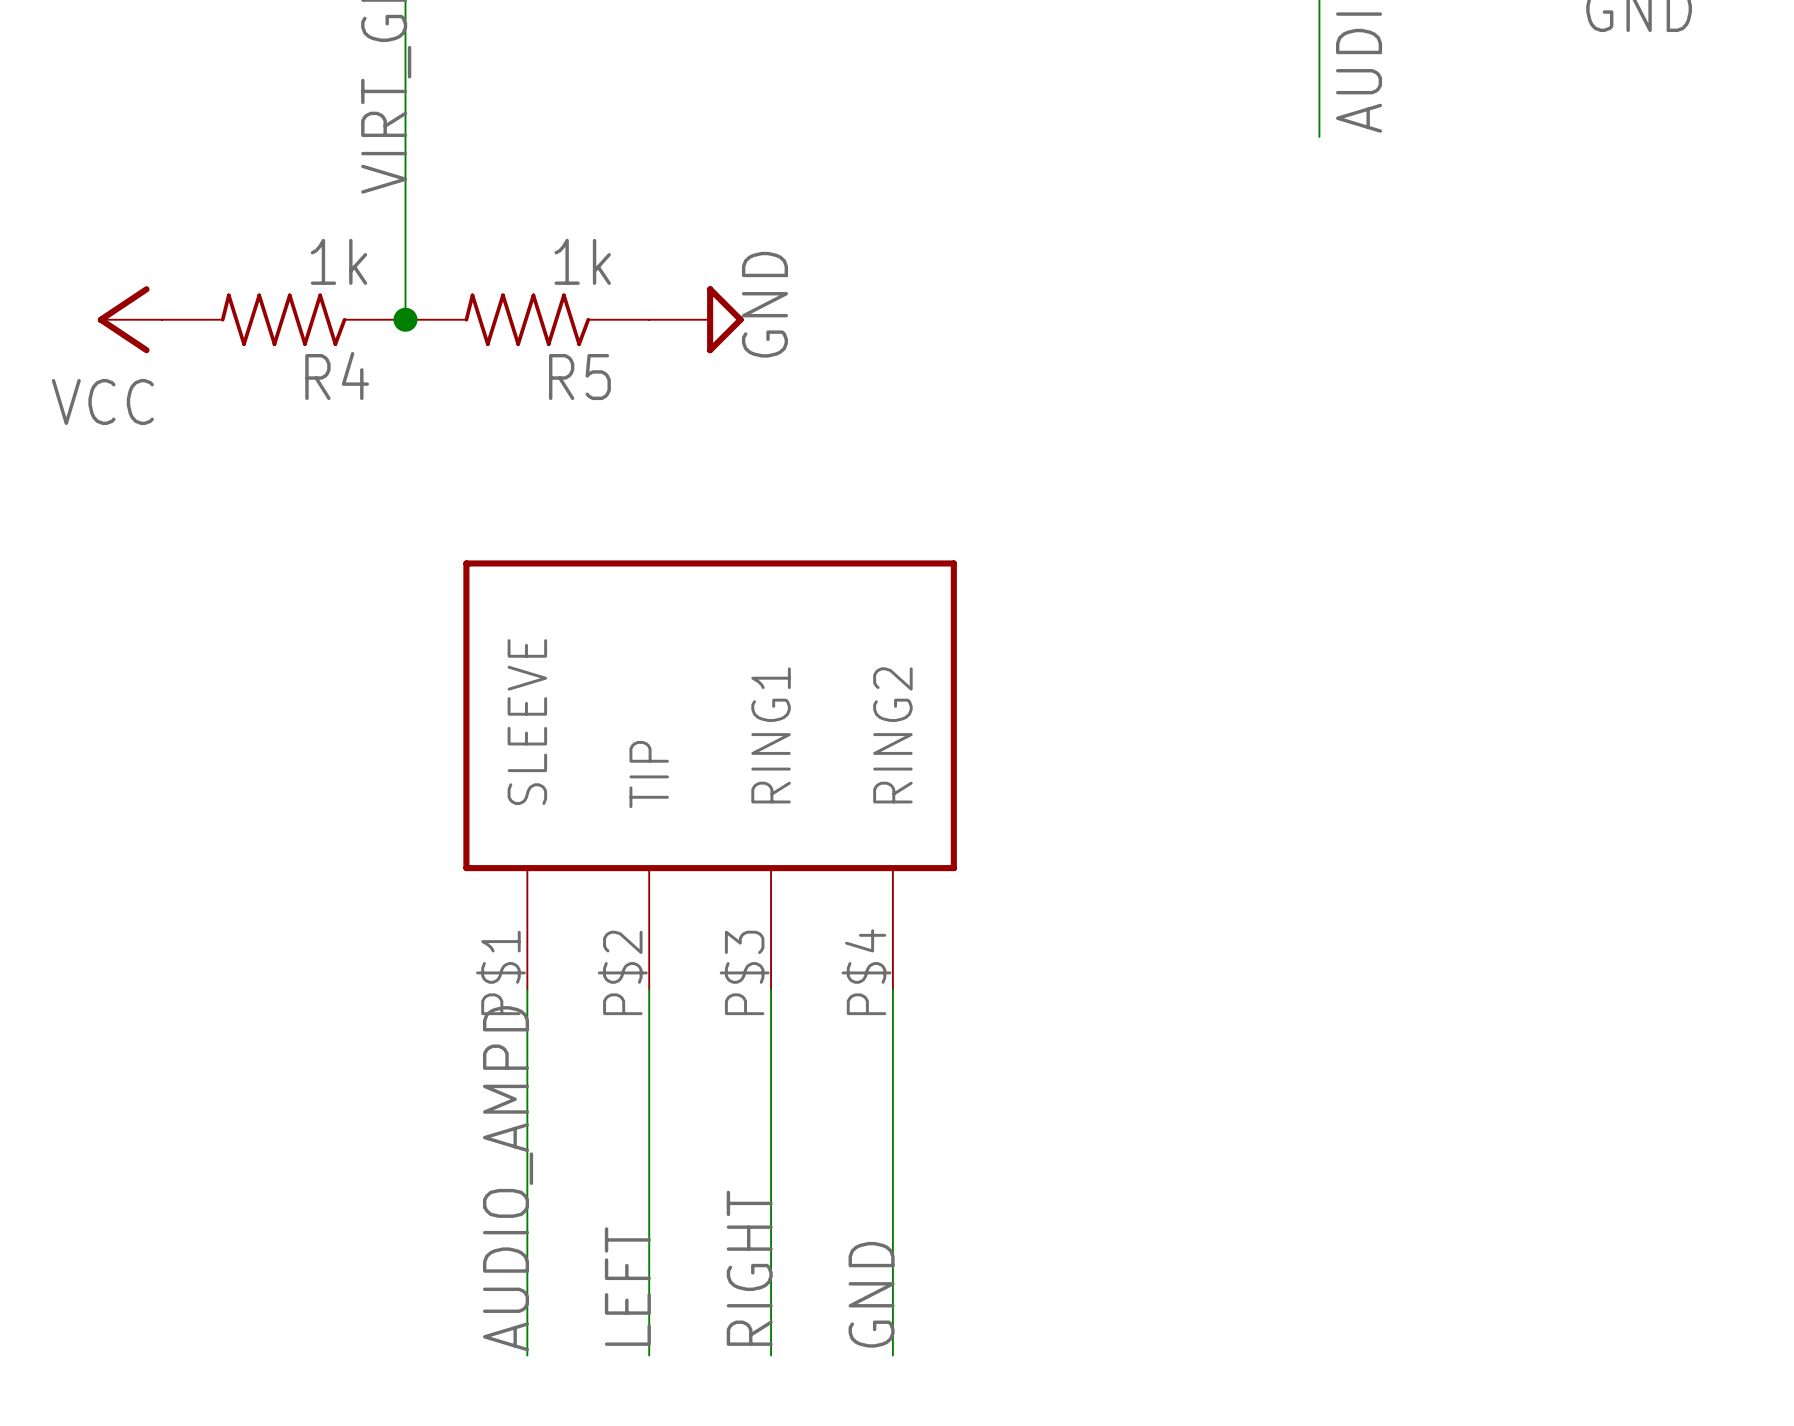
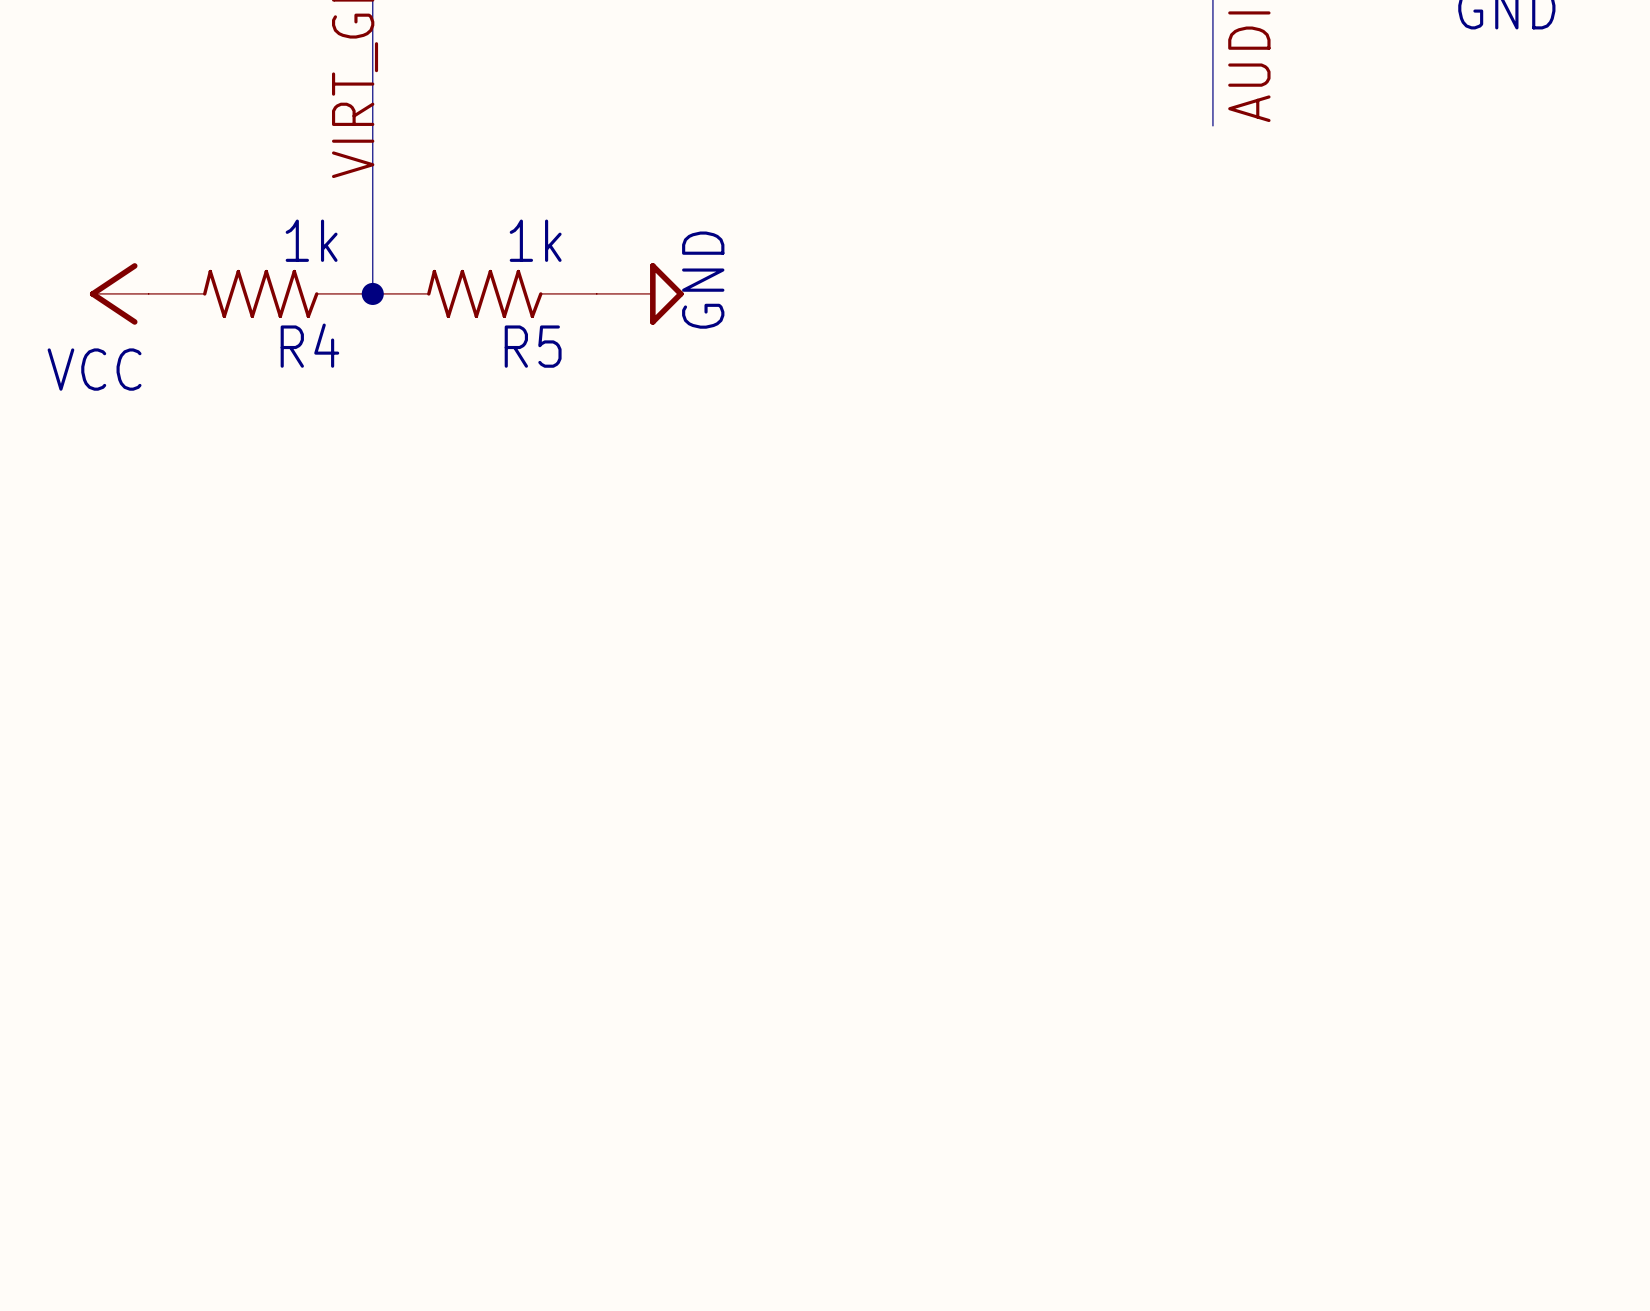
part: (710, 775) -> none
wire: (527, 989) (527, 1355) -> none
wire: (649, 989) (649, 1355) -> none
wire: (771, 989) (771, 1355) -> none
wire: (892, 989) (892, 1355) -> none
label: AUDIO_AMPD (508, 1178) -> none
label: RIGHT (749, 1268) -> none
label: LEFT (627, 1286) -> none
label: GND (871, 1294) -> none

